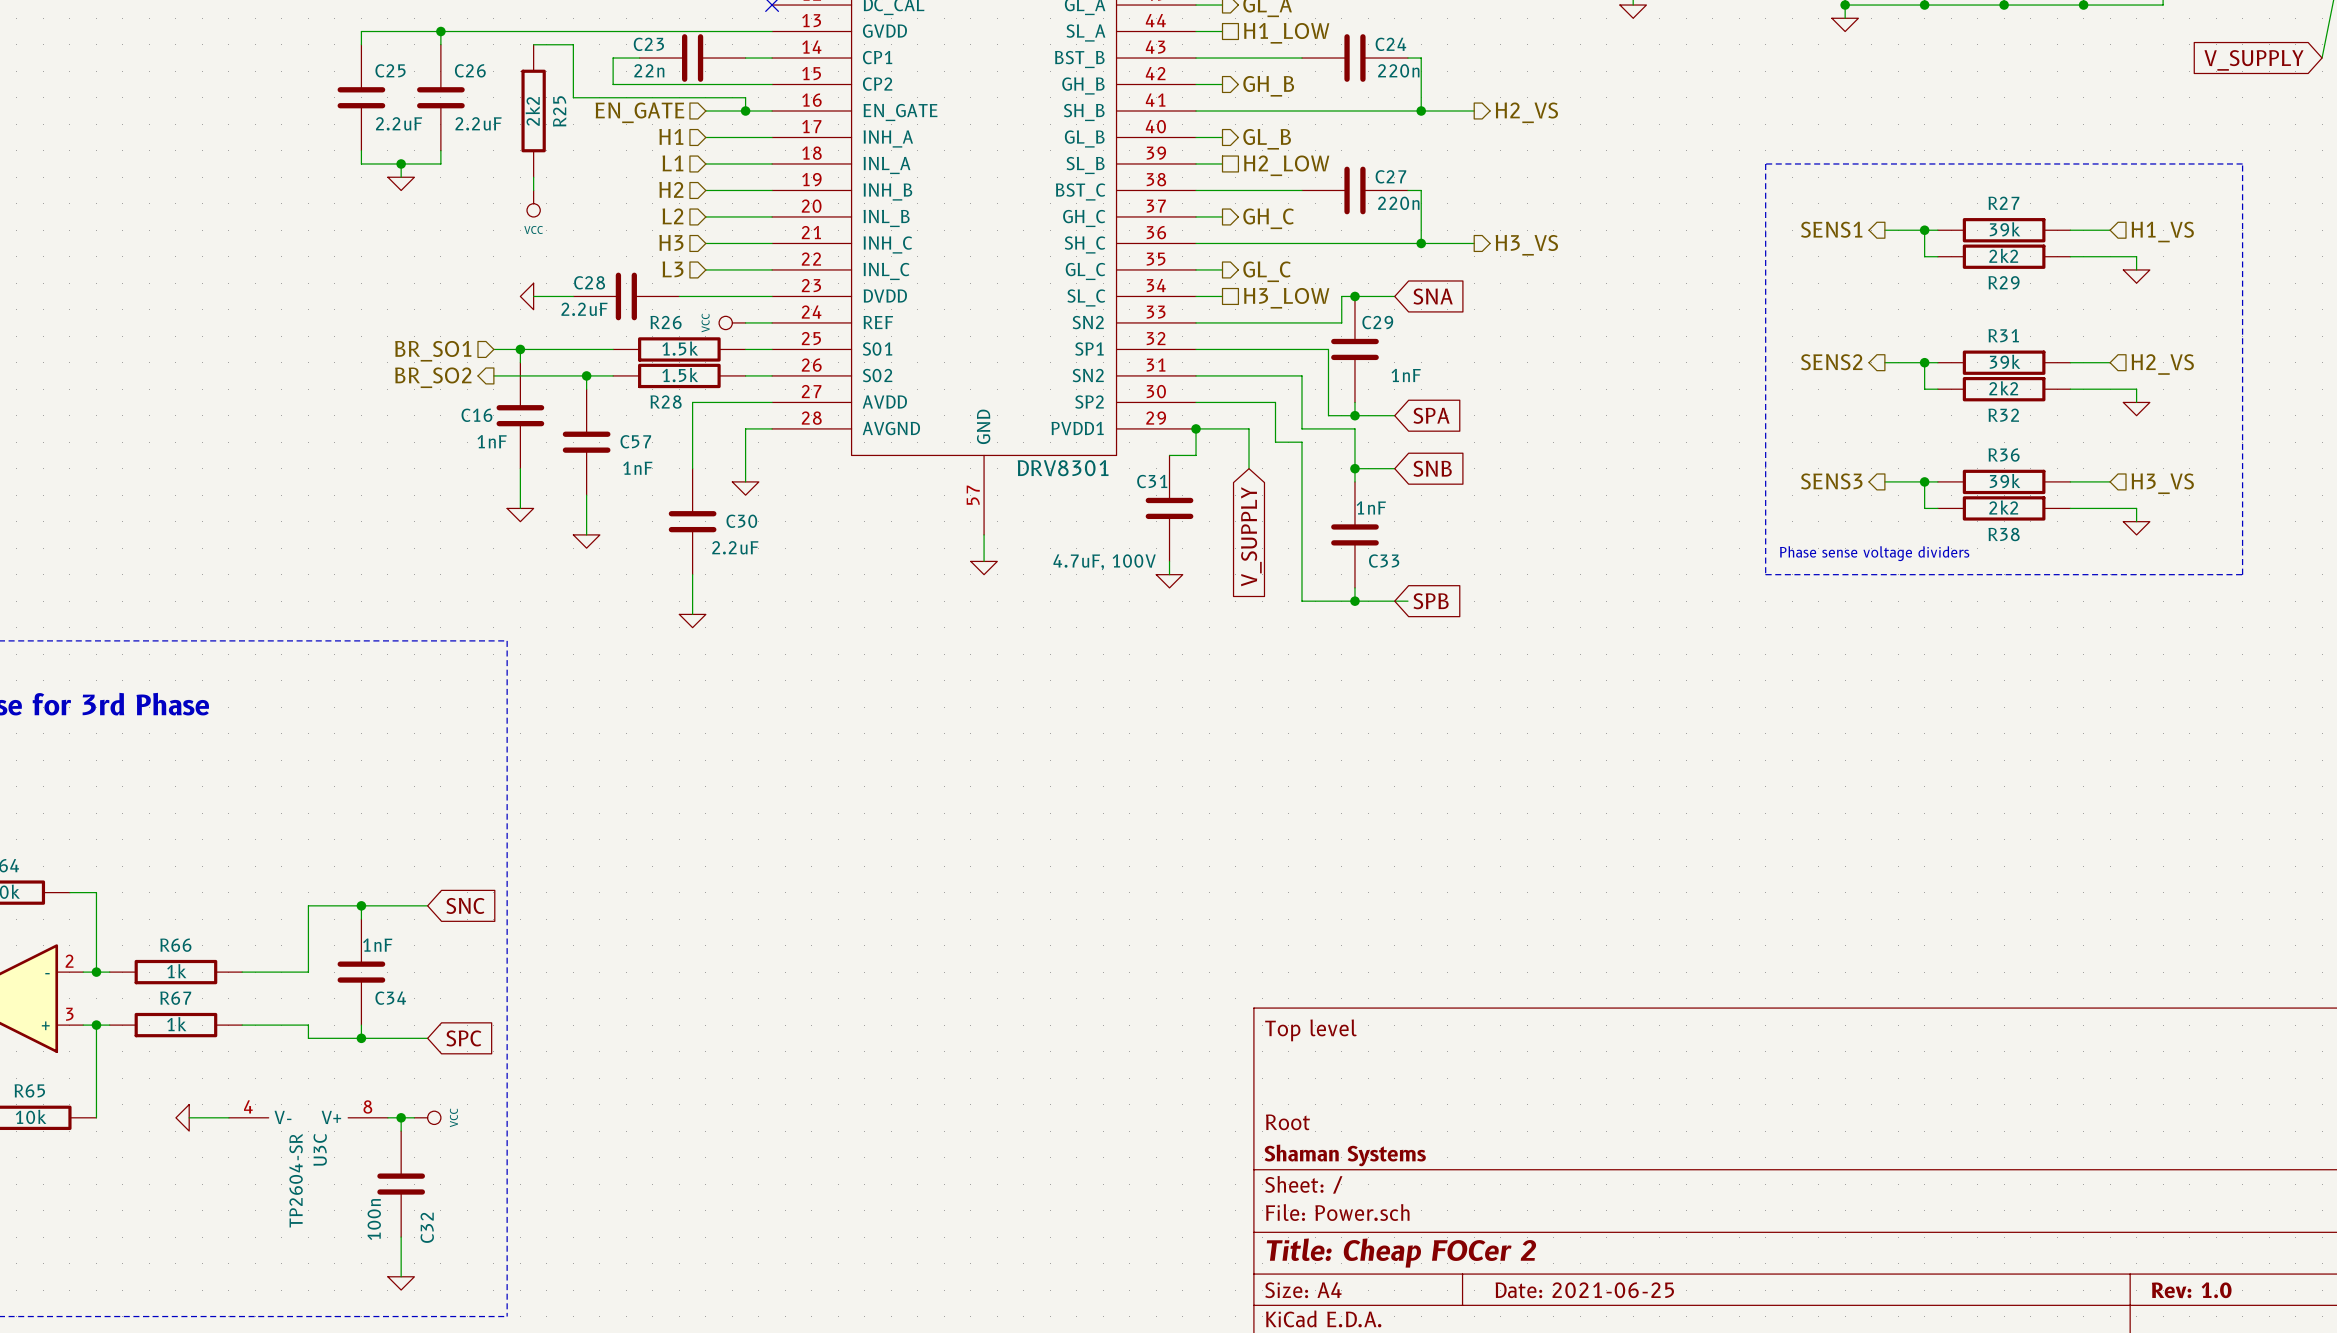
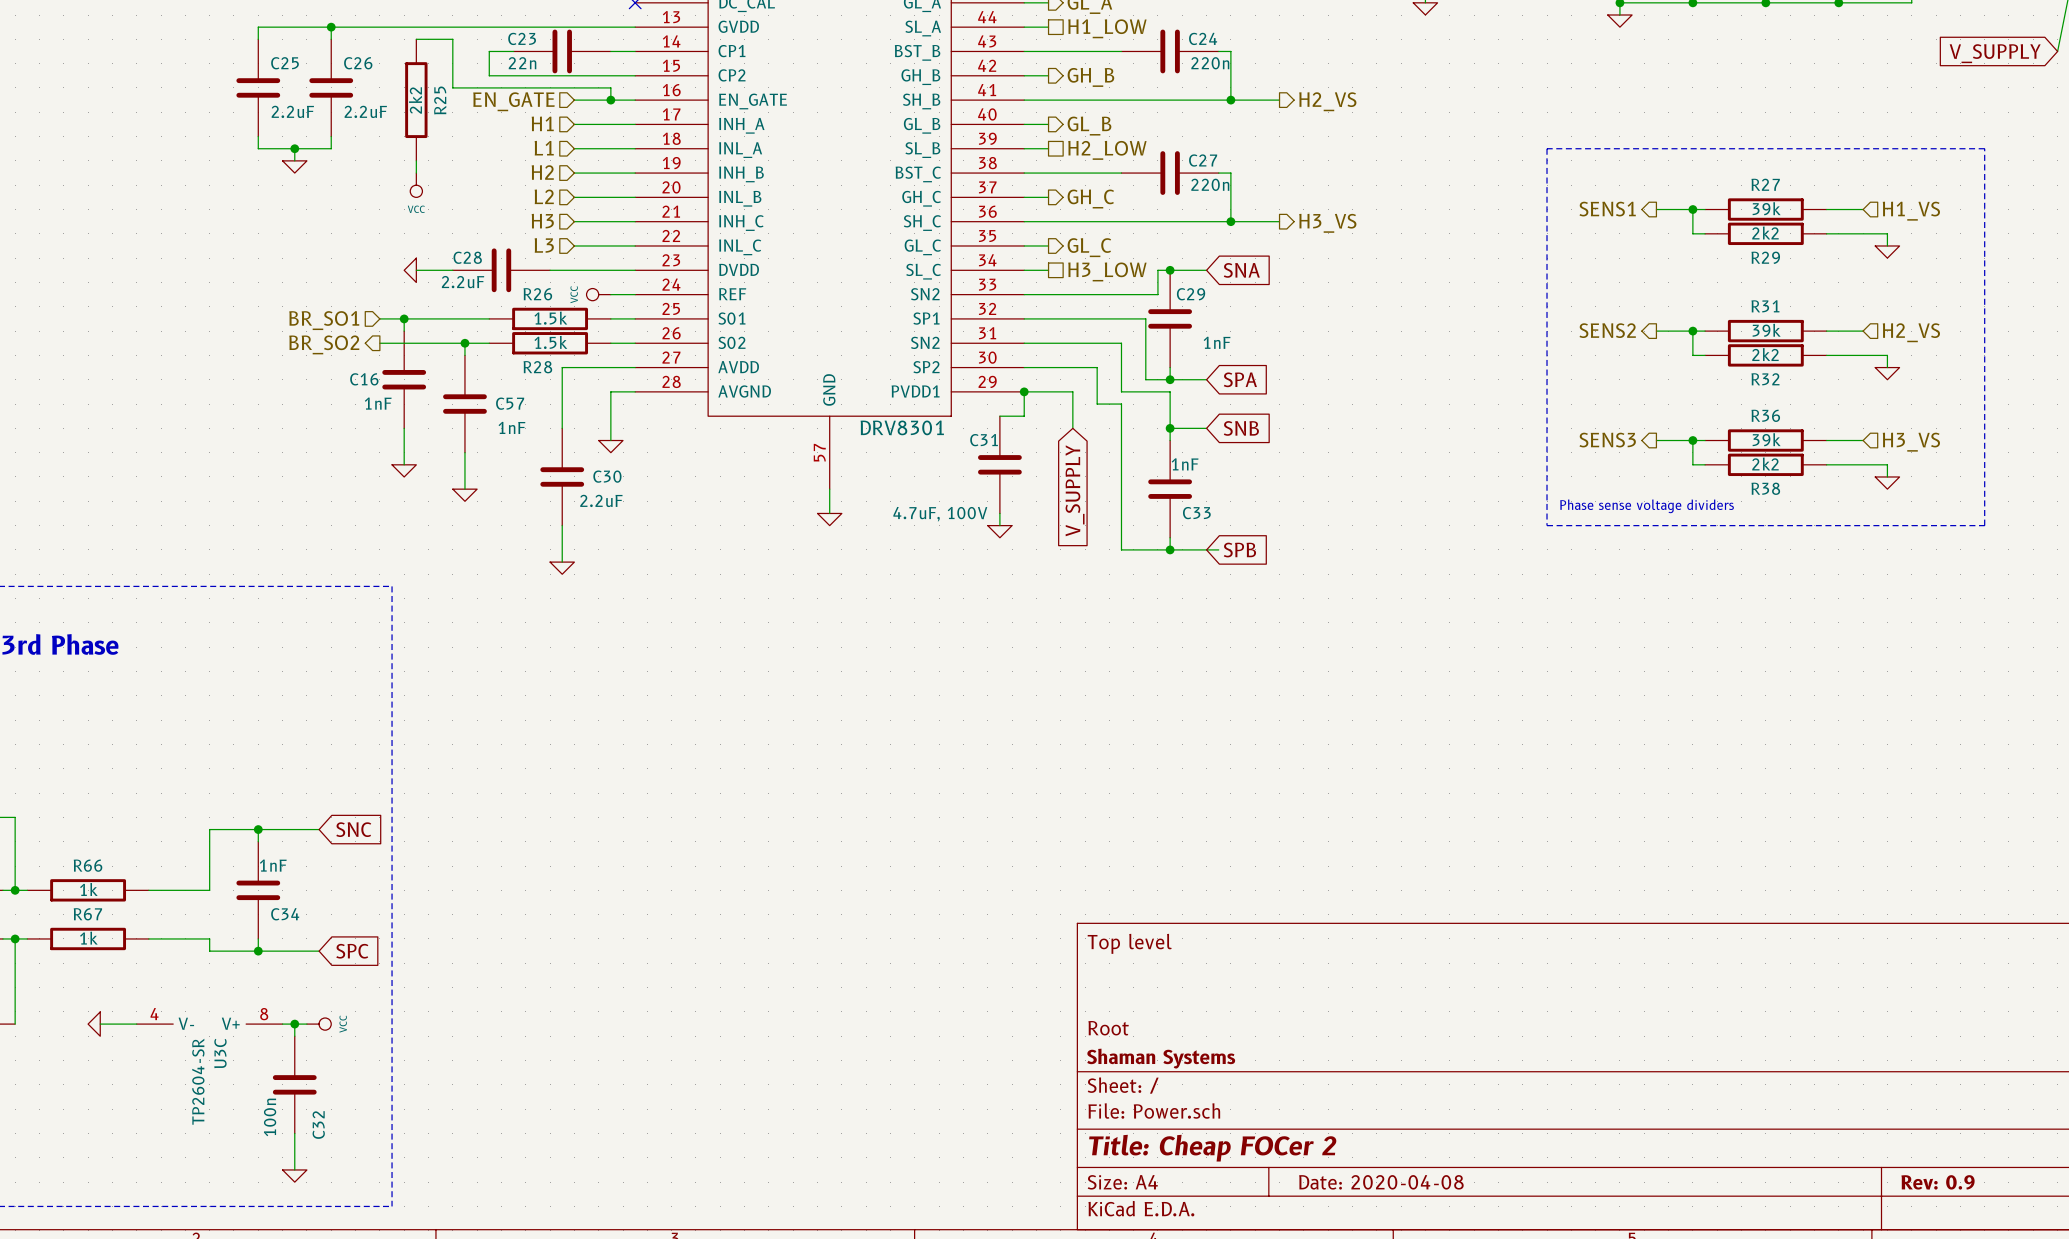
title block: Date: 2021-06-25 (1584, 1290) -> Date: 2020-04-08 (1381, 1182)
title block: Rev: 1.0 (2191, 1290) -> Rev: 0.9 (1938, 1182)

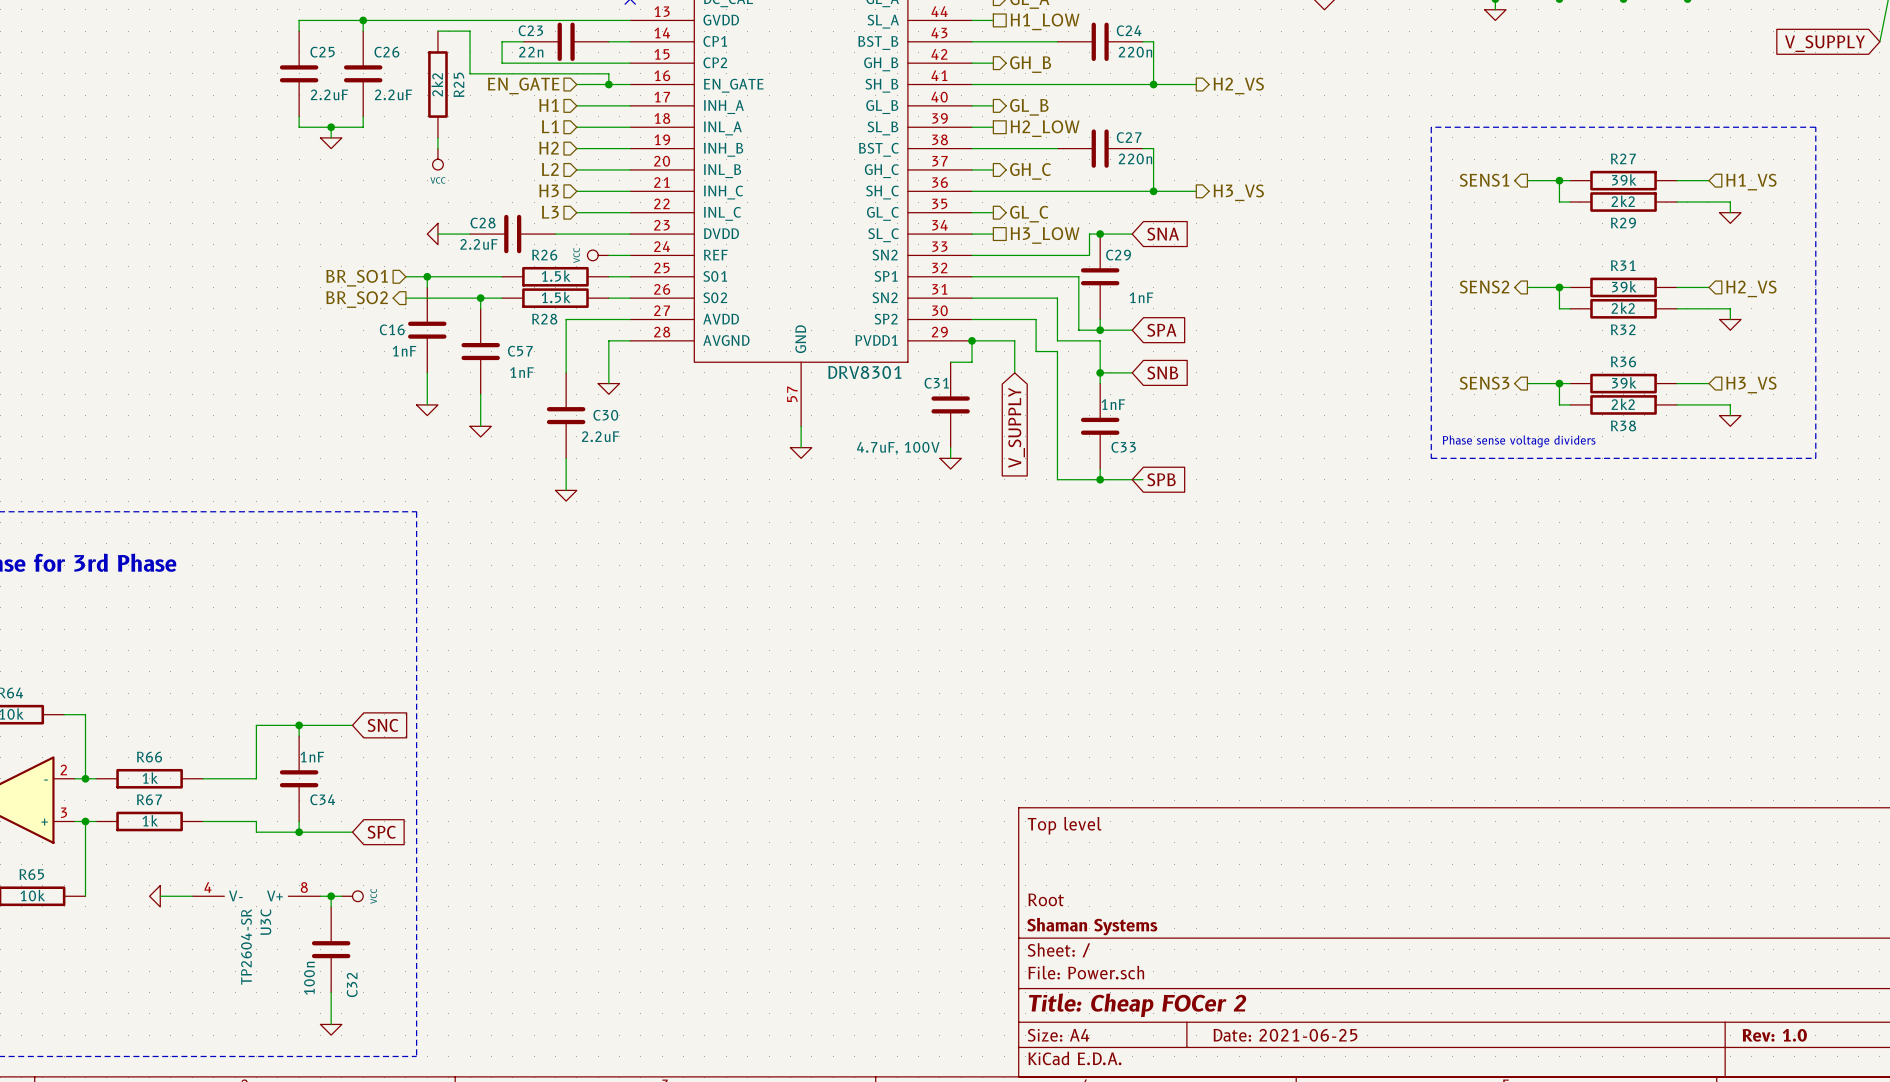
title block: Date: 2020-04-08 (1381, 1182) -> Date: 2021-06-25 (1285, 1035)
title block: Rev: 0.9 (1938, 1182) -> Rev: 1.0 (1774, 1035)

